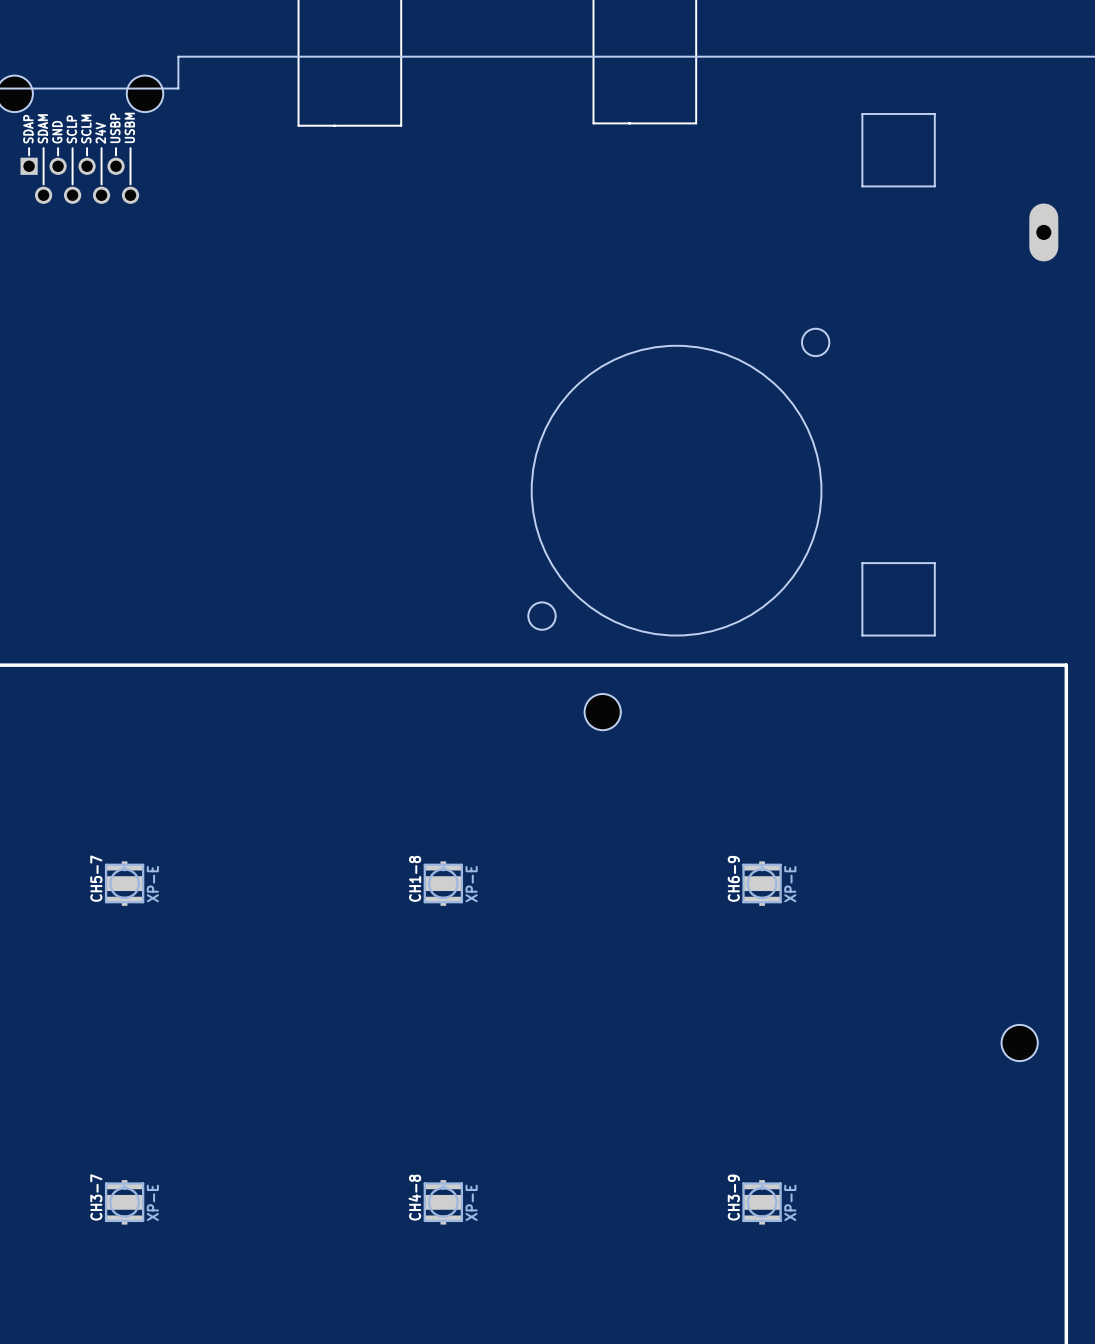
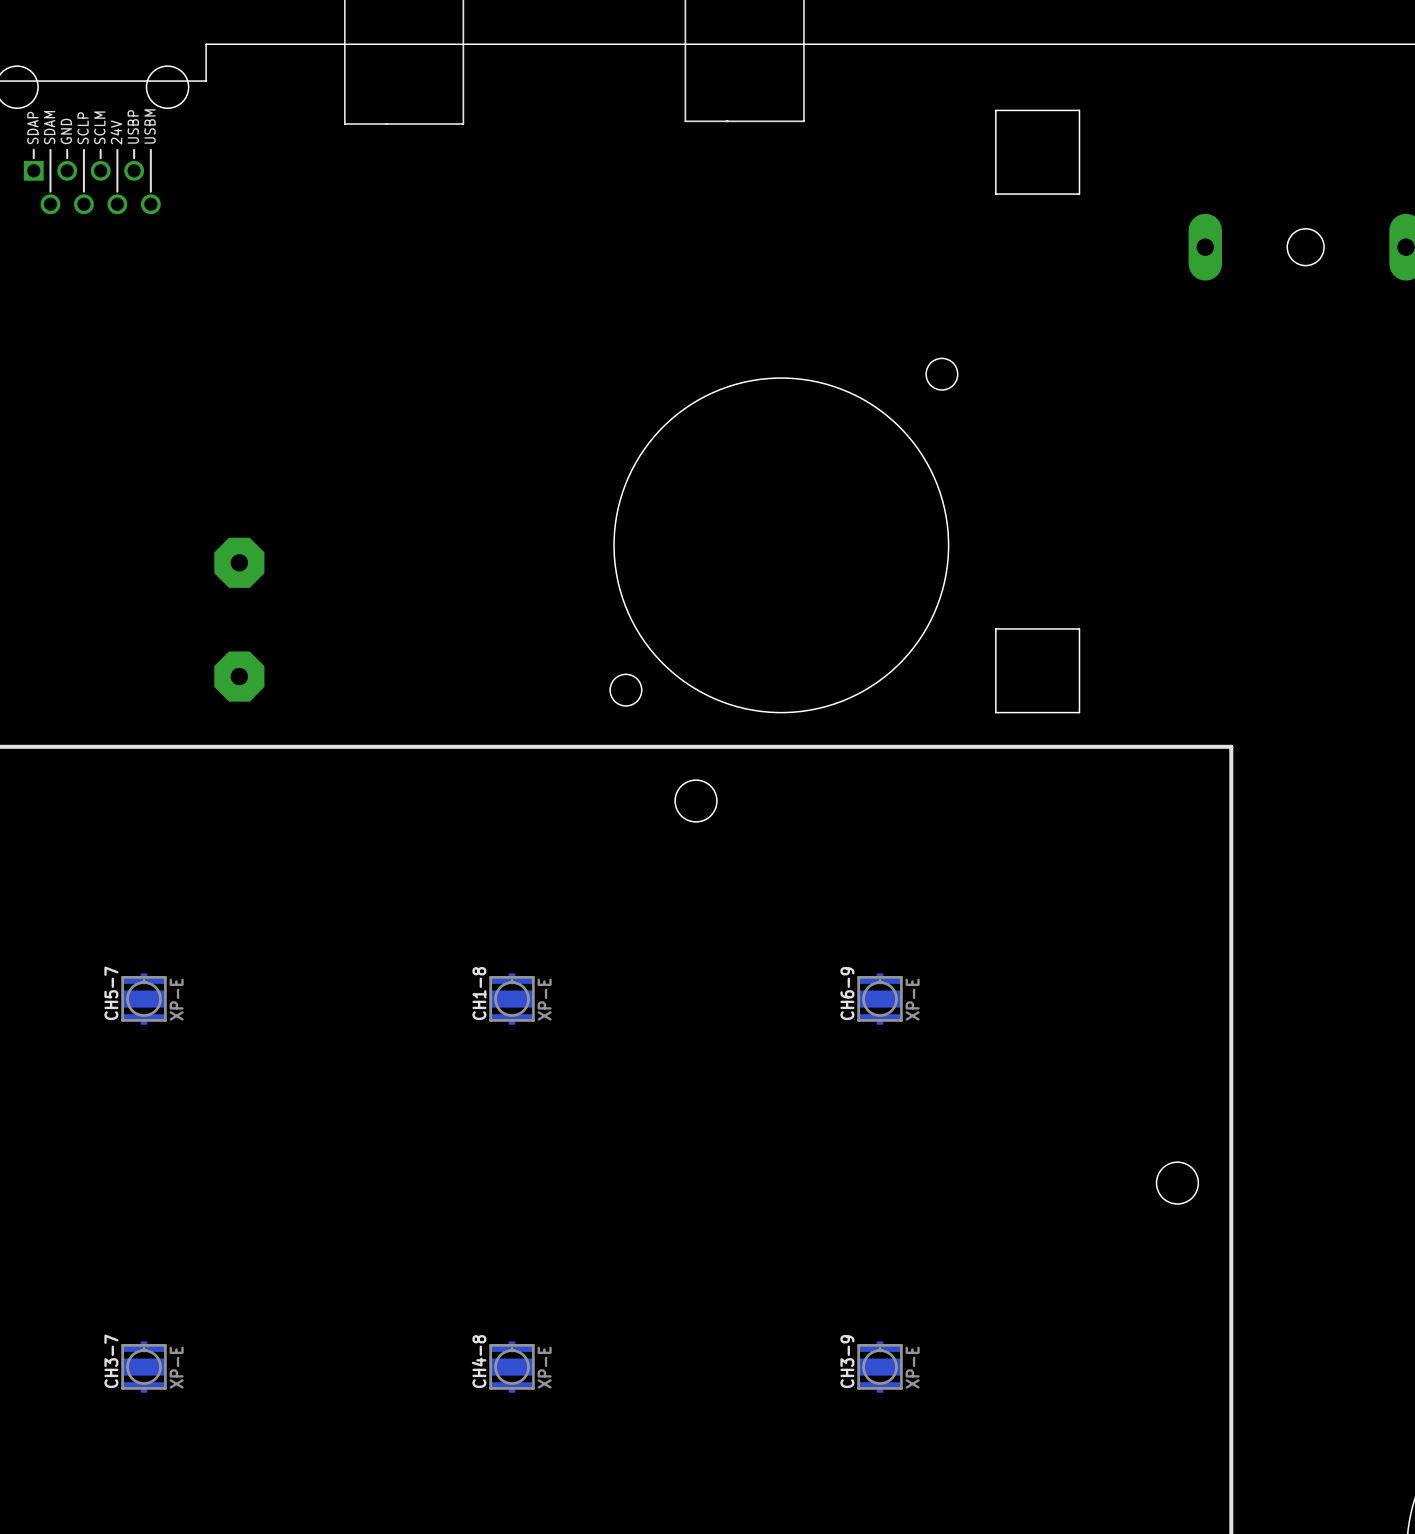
part: none -> (239, 562)
part: none -> (239, 676)

